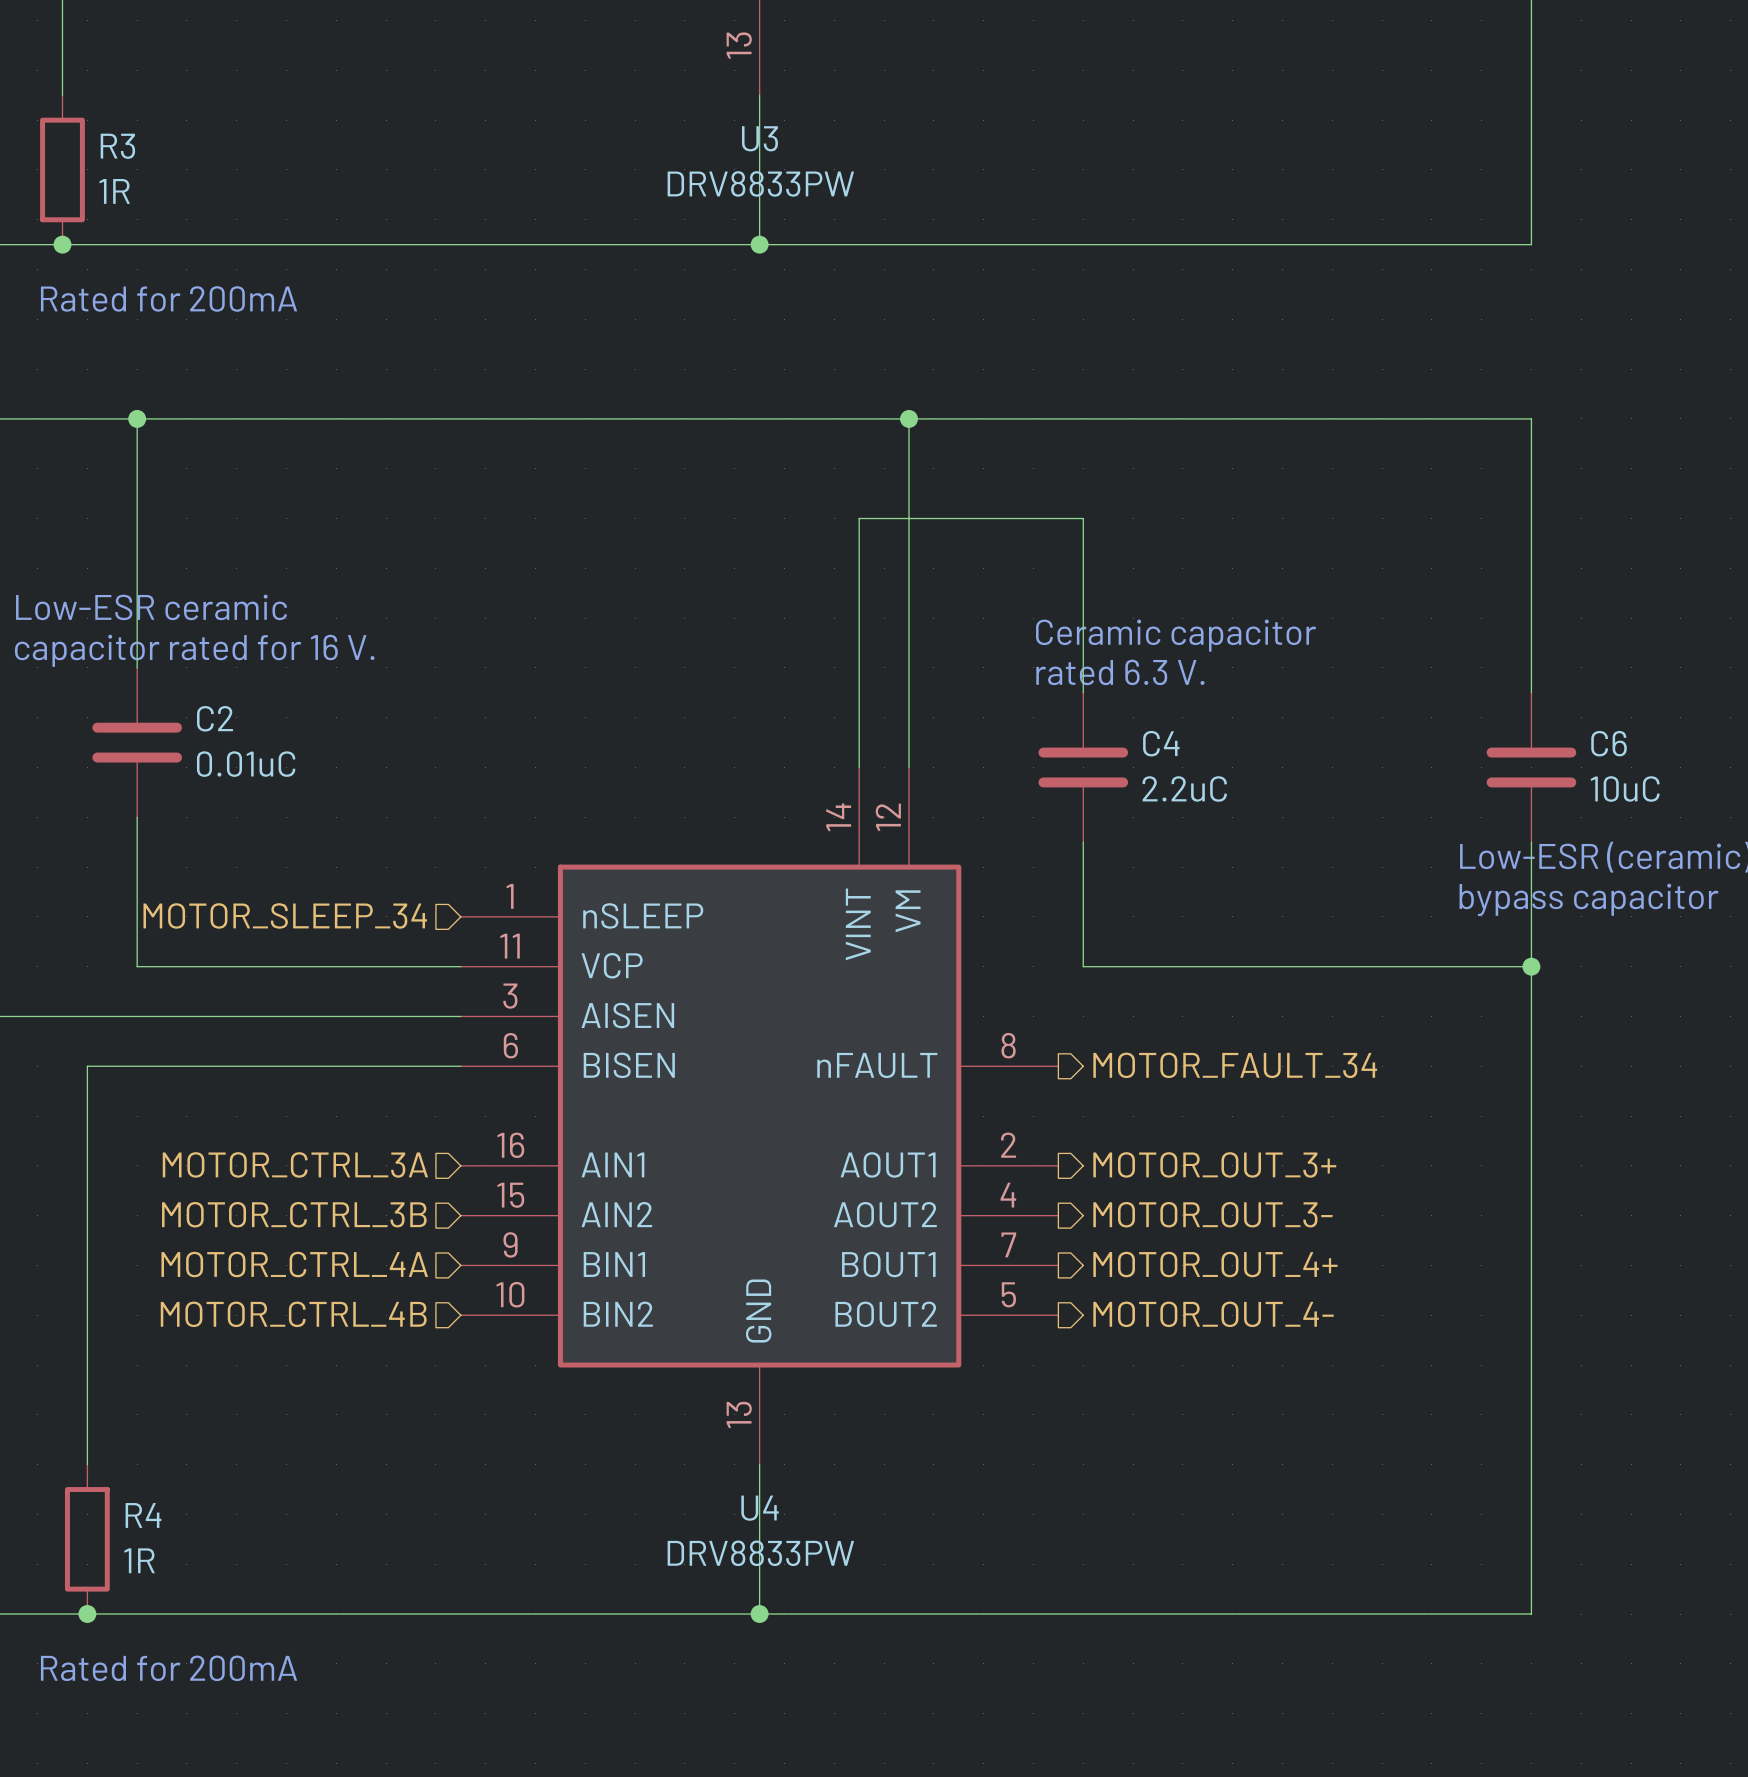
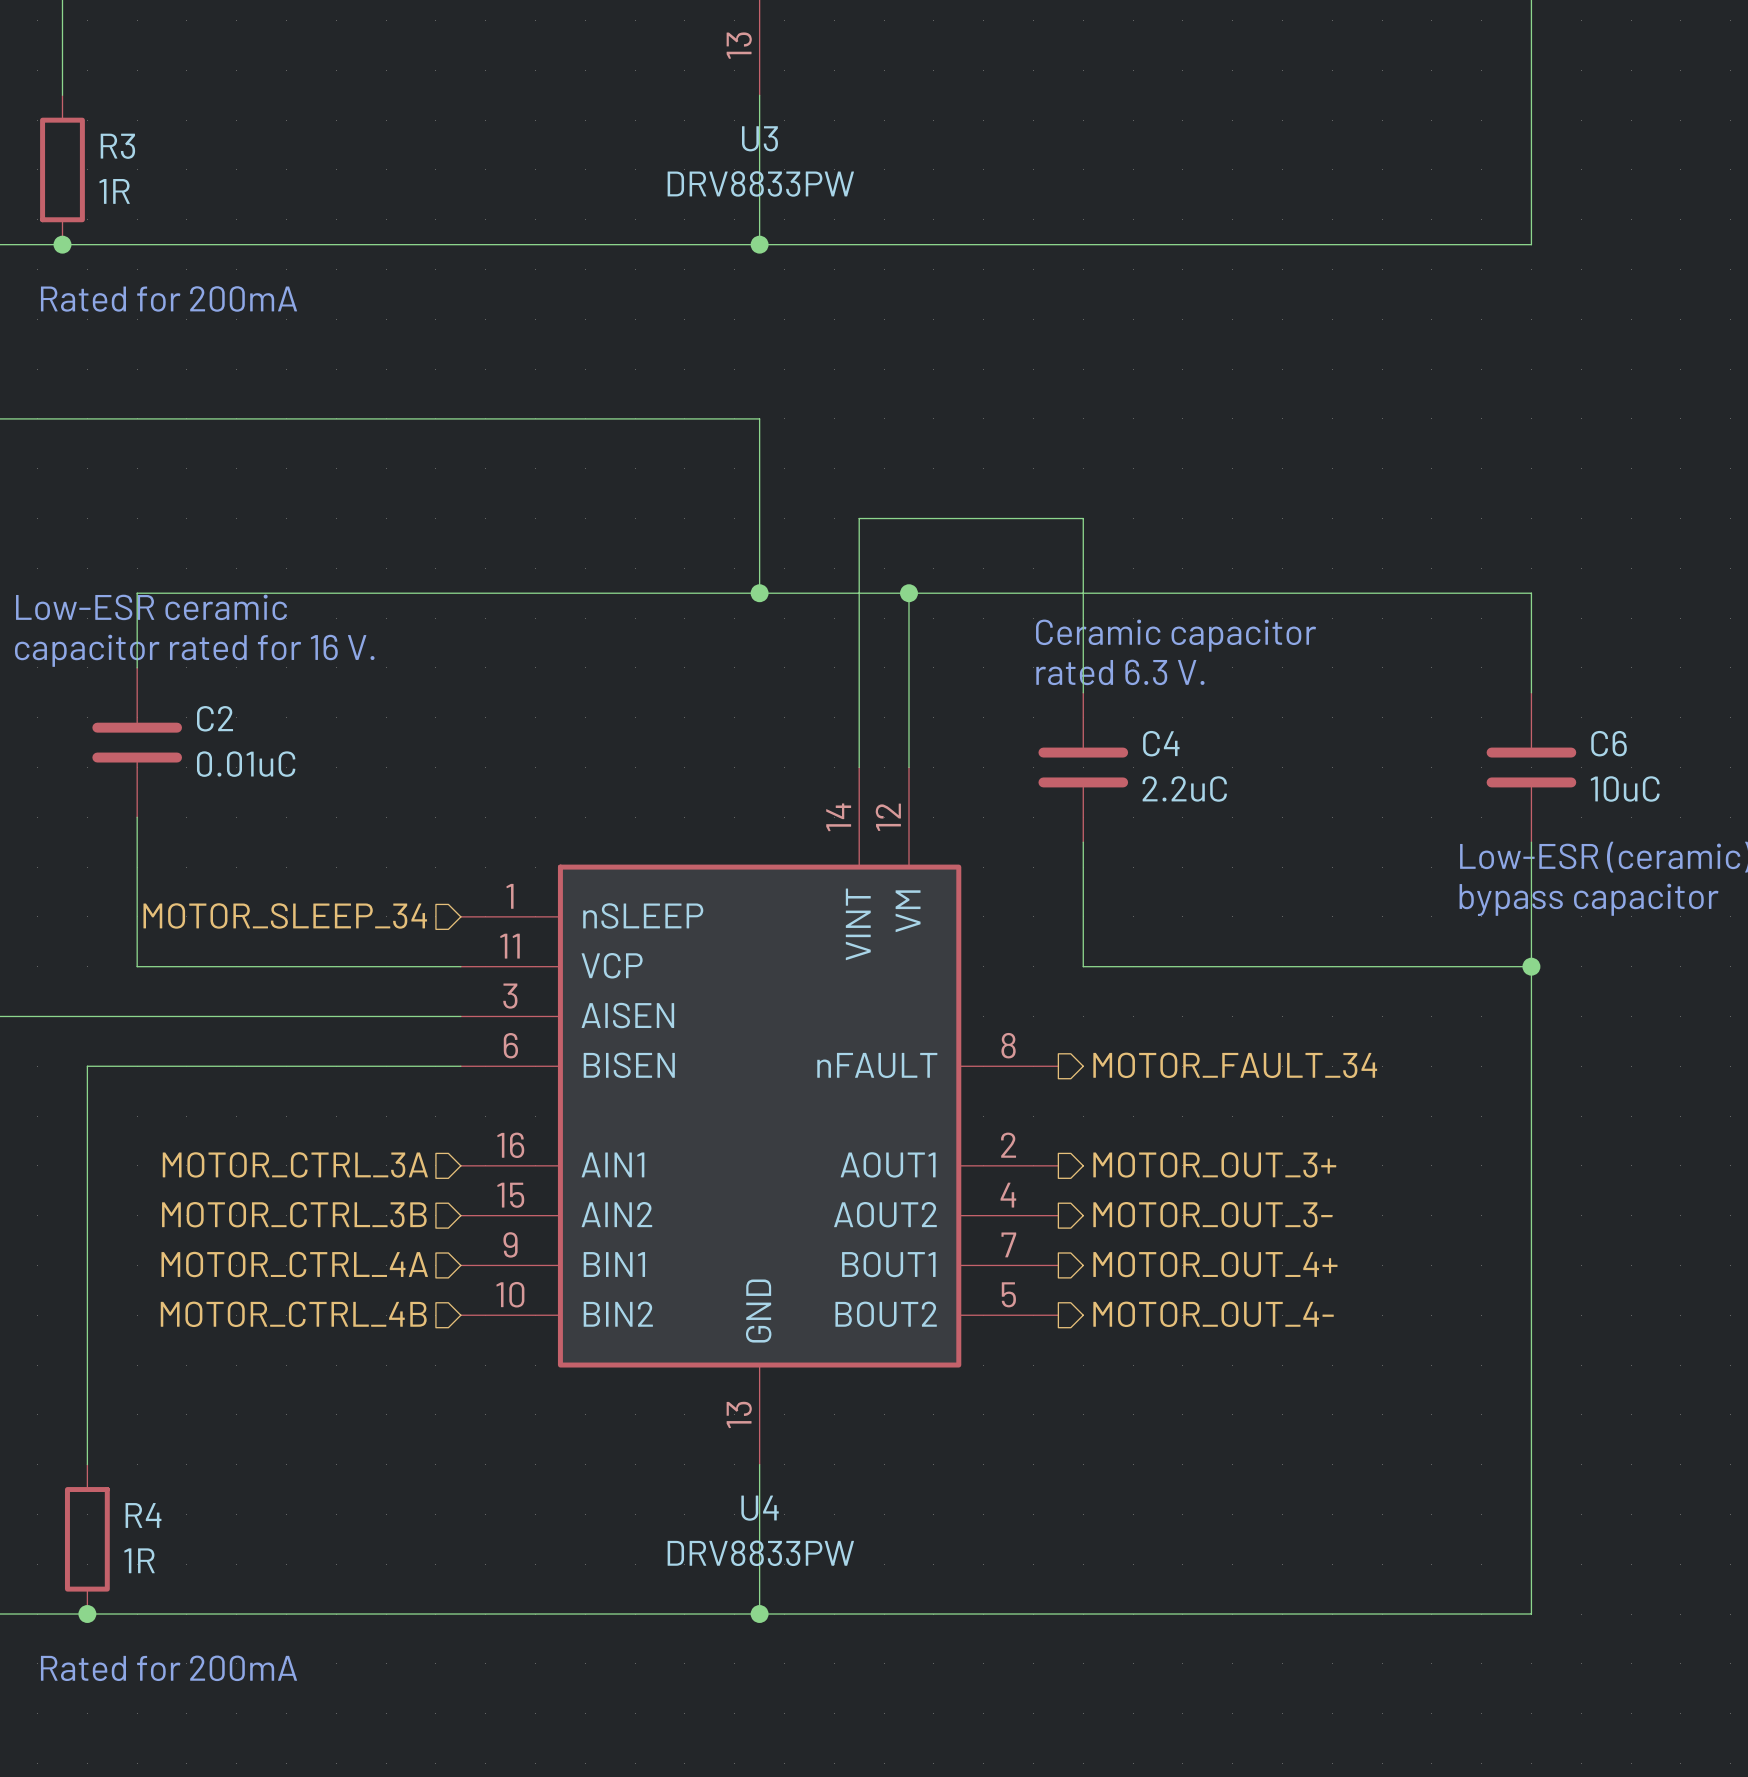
wire: (137, 418) (137, 593) -> none
junction: (137, 418) -> none
wire: (759, 418) (1531, 418) (1531, 593) -> (137, 593) (1531, 593)
wire: (909, 418) (909, 593) -> (759, 418) (759, 593)
junction: (909, 418) -> none
junction: none -> (759, 593)
junction: none -> (909, 593)

